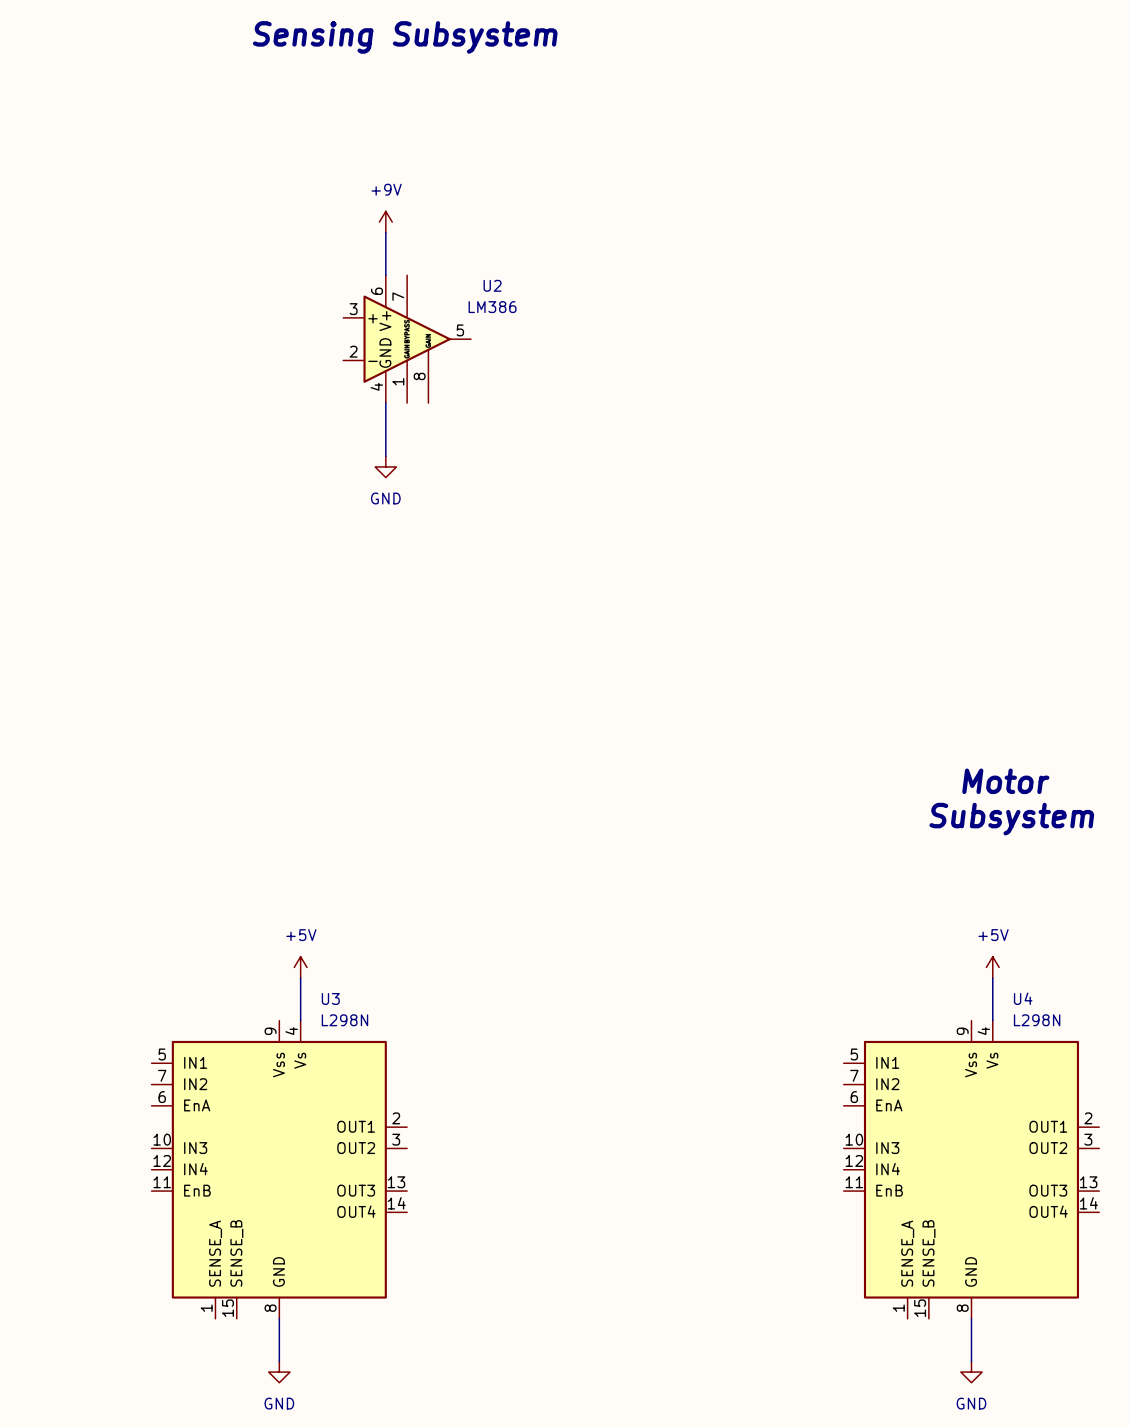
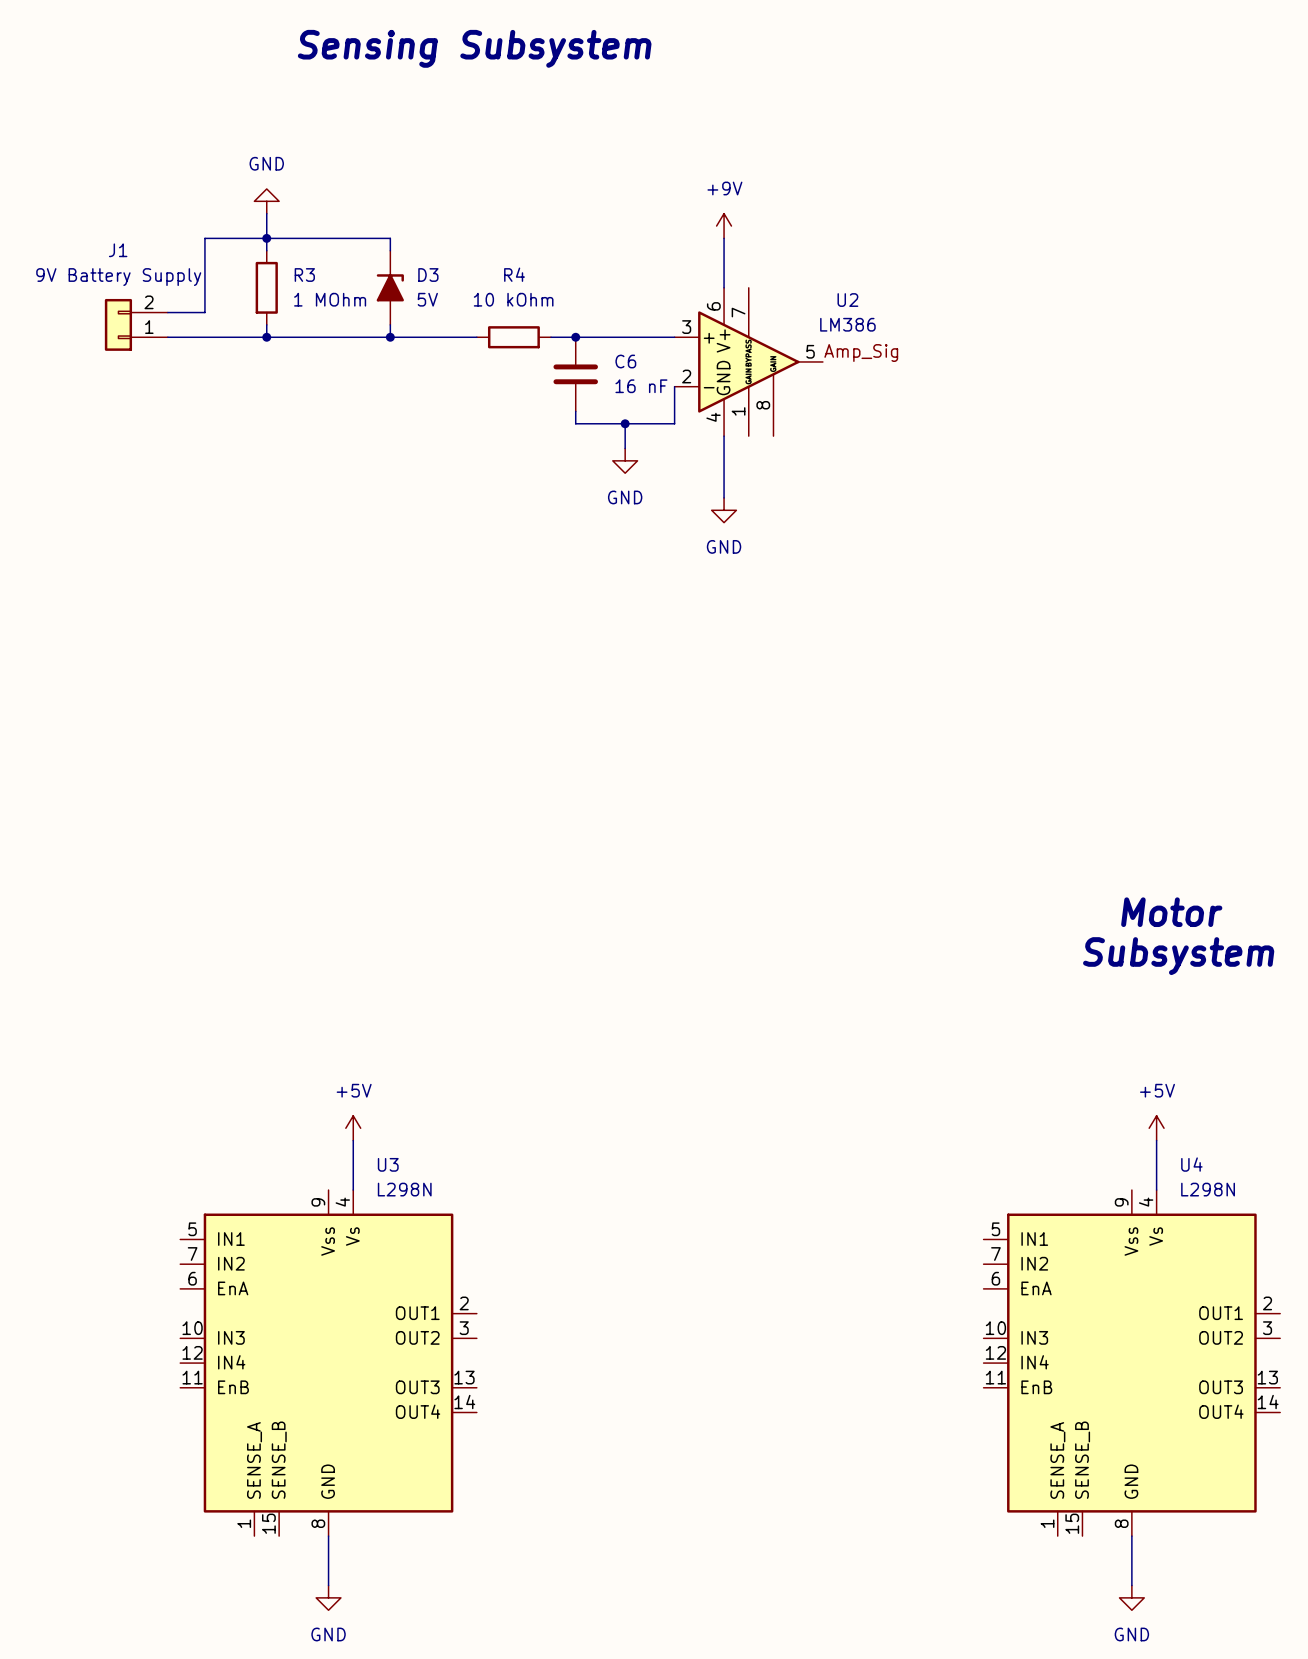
power symbol: none -> GND (266, 201)
wire: none -> (266, 213) (266, 250)
power symbol: none -> +9V (724, 226)
junction: none -> (266, 238)
wire: none -> (724, 238) (724, 287)
wire: none -> (390, 250) (390, 238) (204, 238) (204, 312) (167, 312)
power symbol: +9V (385, 222) -> none
wire: (385, 232) (385, 275) -> none
R3: none -> 1 MOhm (266, 287)
D3: none -> 5V (390, 287)
J1: none -> 9V Battery Supply (136, 324)
wire: none -> (266, 324) (266, 337)
wire: none -> (390, 324) (390, 337)
wire: none -> (167, 337) (476, 337)
junction: none -> (266, 337)
junction: none -> (390, 337)
R4: none -> 10 kOhm (513, 337)
wire: none -> (551, 337) (674, 337)
junction: none -> (575, 337)
label: none -> Amp_Sig (861, 353)
C6: none -> 16 nF (575, 374)
wire: none -> (674, 386) (674, 423) (575, 423) (575, 411)
U2 position: (407, 339) -> (748, 361)
wire: none -> (625, 423) (625, 448)
junction: none -> (625, 423)
wire: none -> (724, 436) (724, 497)
power symbol: none -> GND (625, 460)
wire: (385, 403) (385, 456) -> none
power symbol: none -> GND (724, 510)
power symbol: GND (385, 466) -> none

